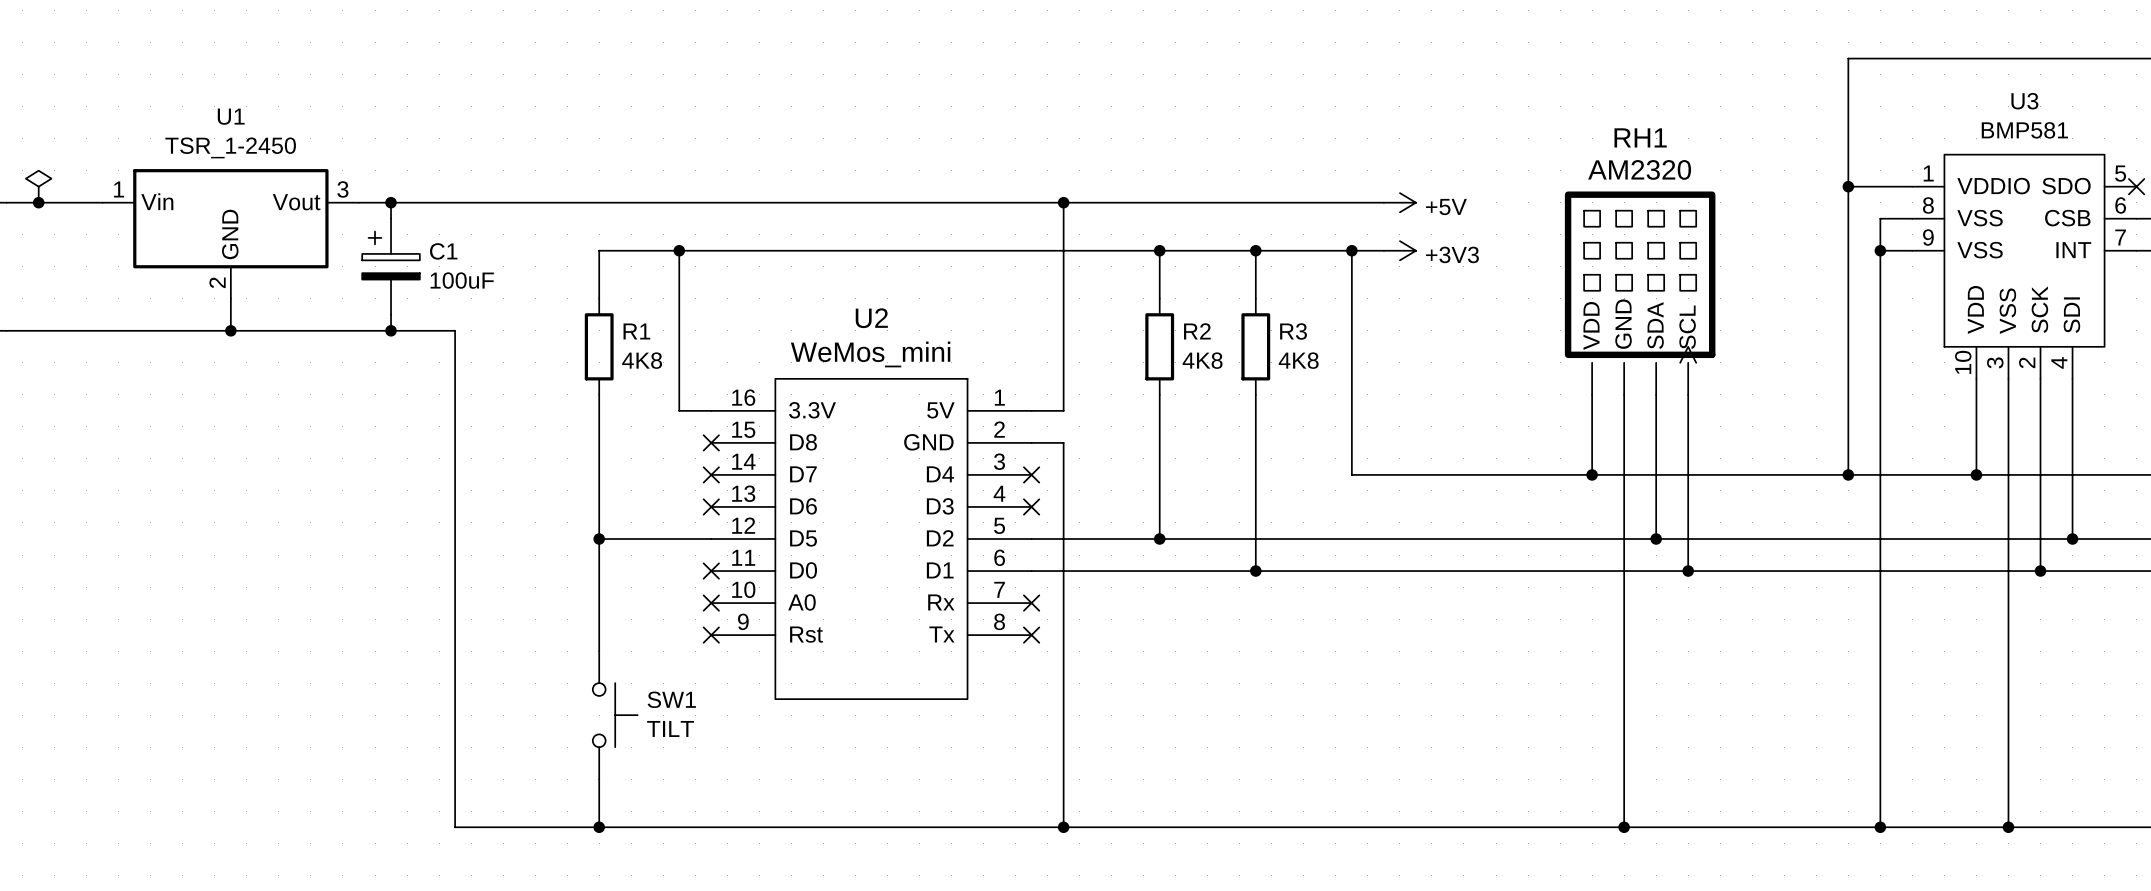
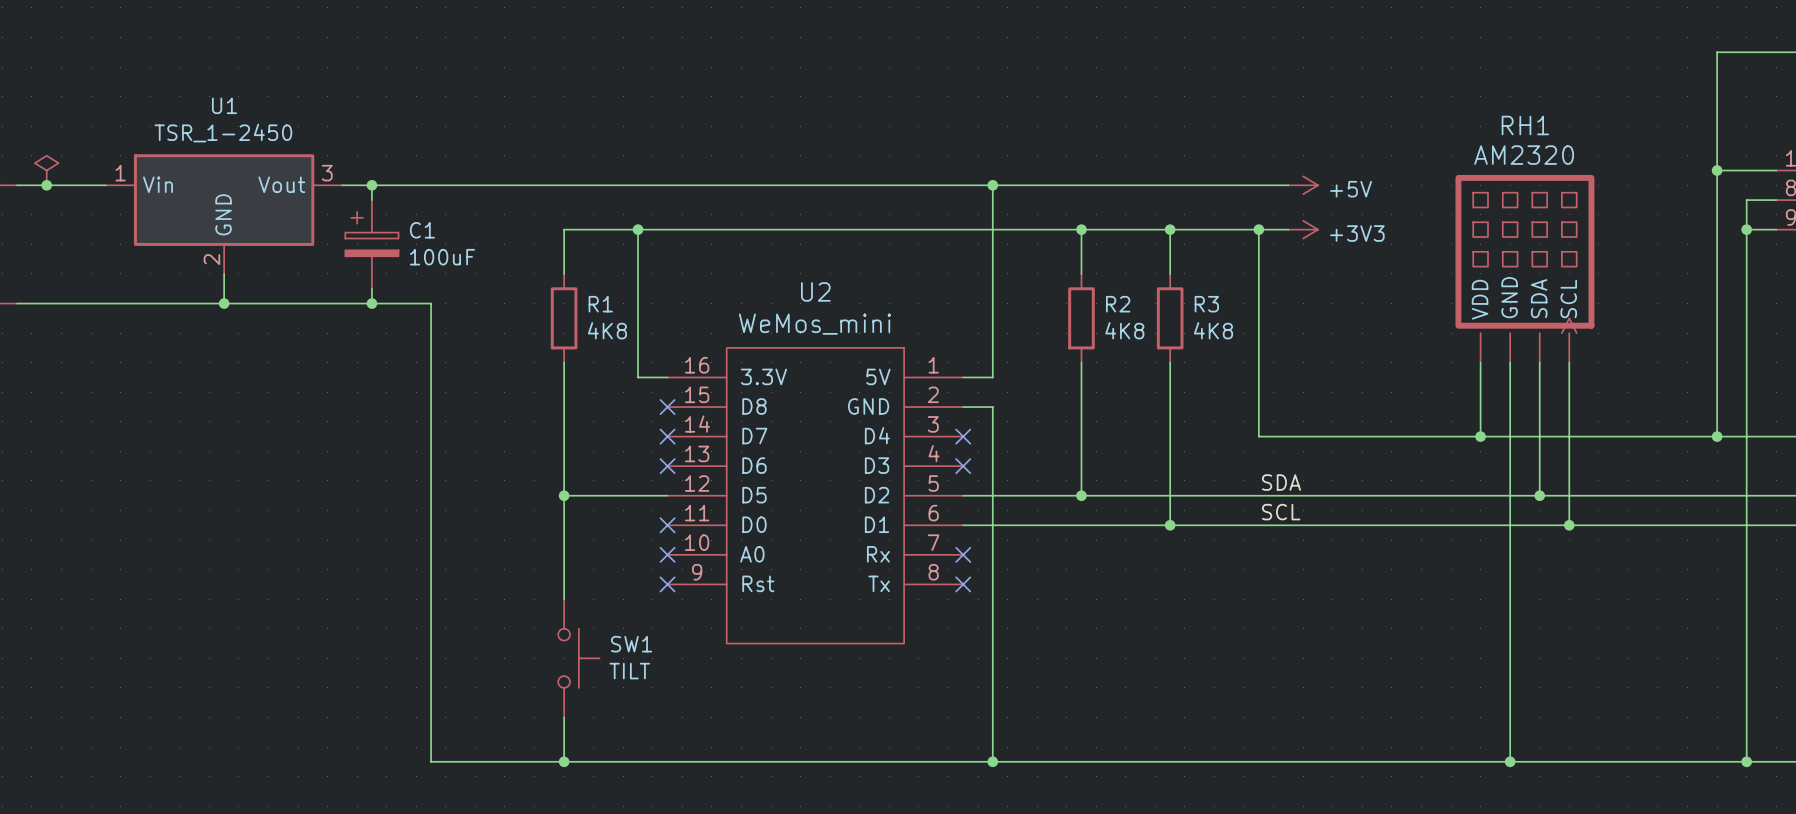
label: none -> SDA (1281, 482)
label: none -> SCL (1281, 512)

